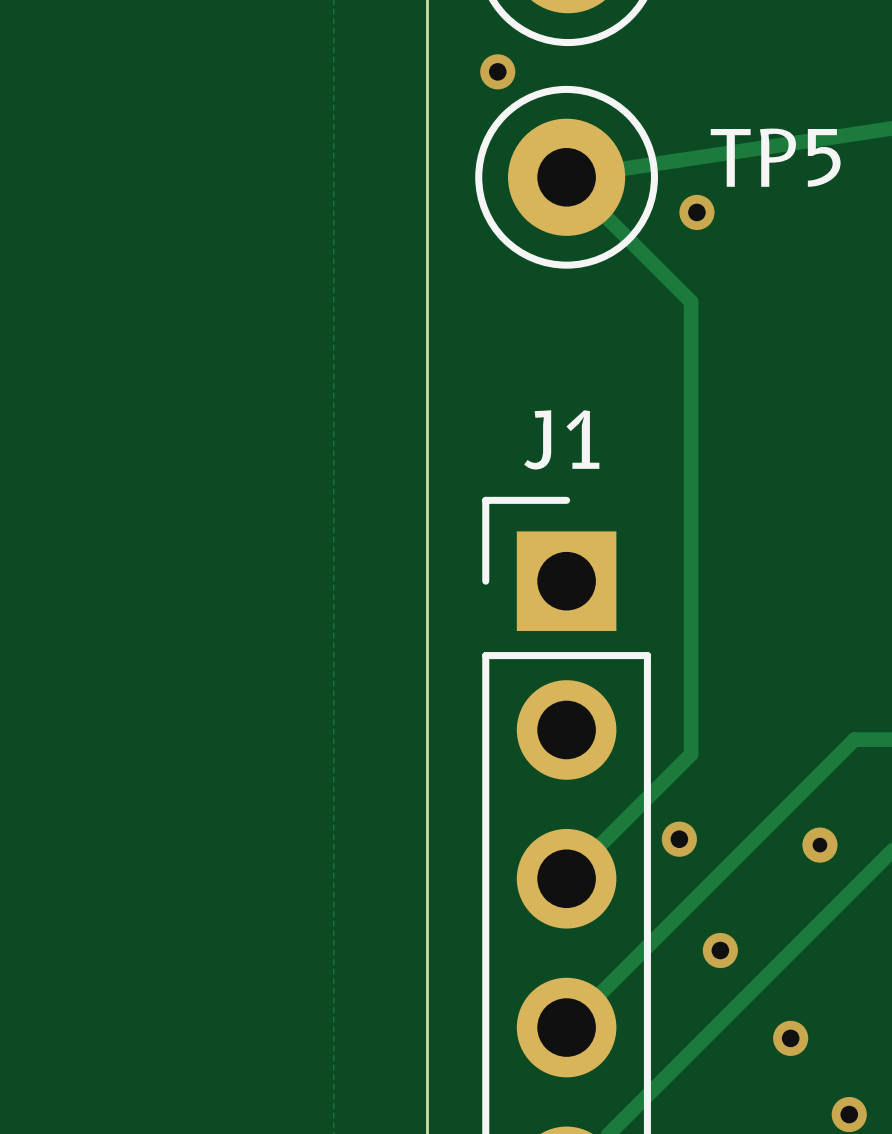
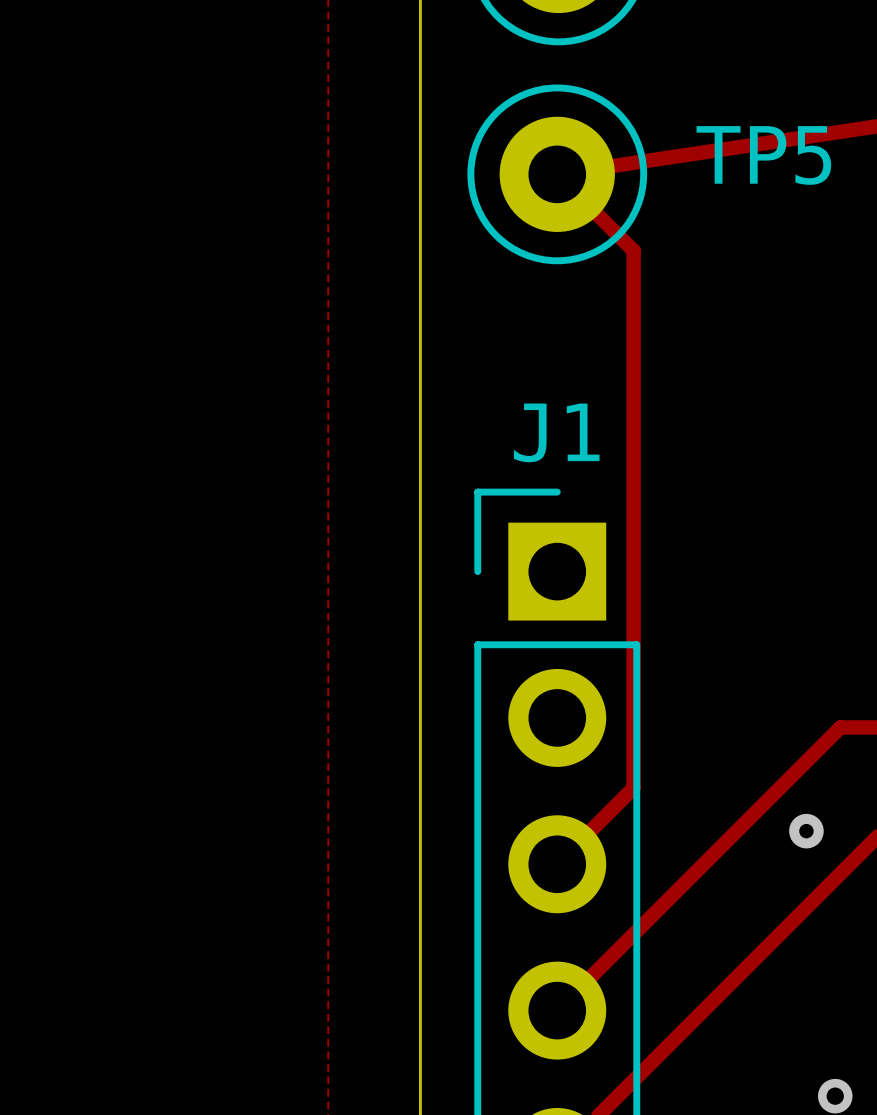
via: (497, 71) -> none
via: (696, 212) -> none
track: (644, 254) (691, 301) (691, 754) (644, 801) -> (633, 250) (633, 787)
via: (679, 839) -> none
via: (720, 950) -> none
via: (790, 1038) -> none

